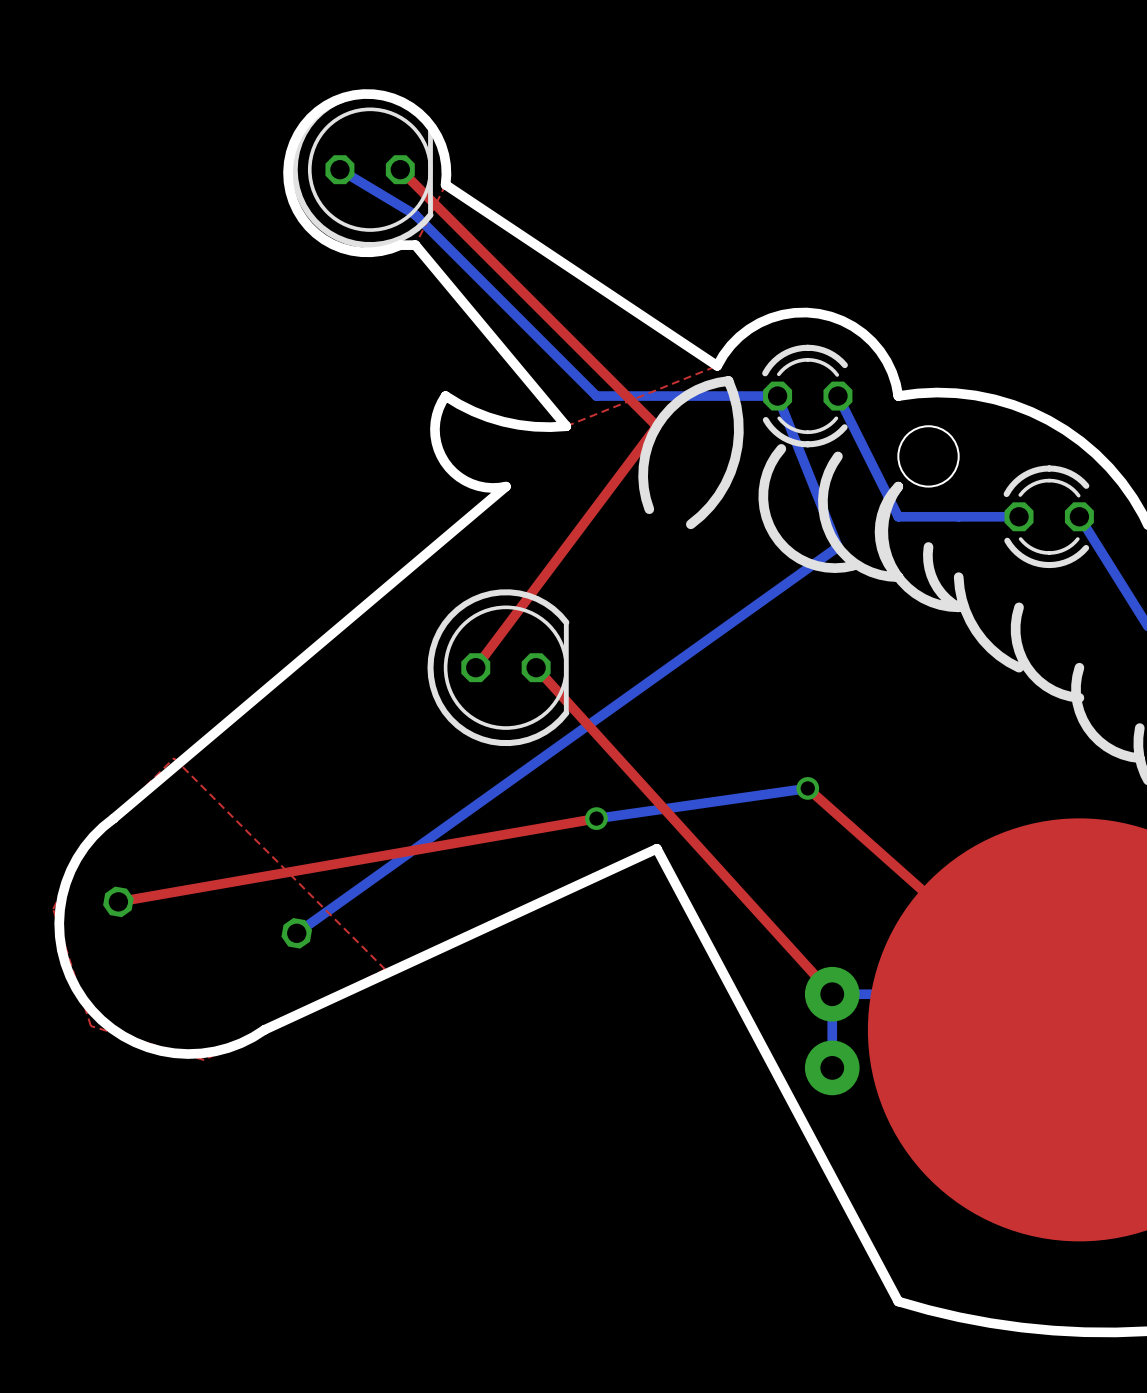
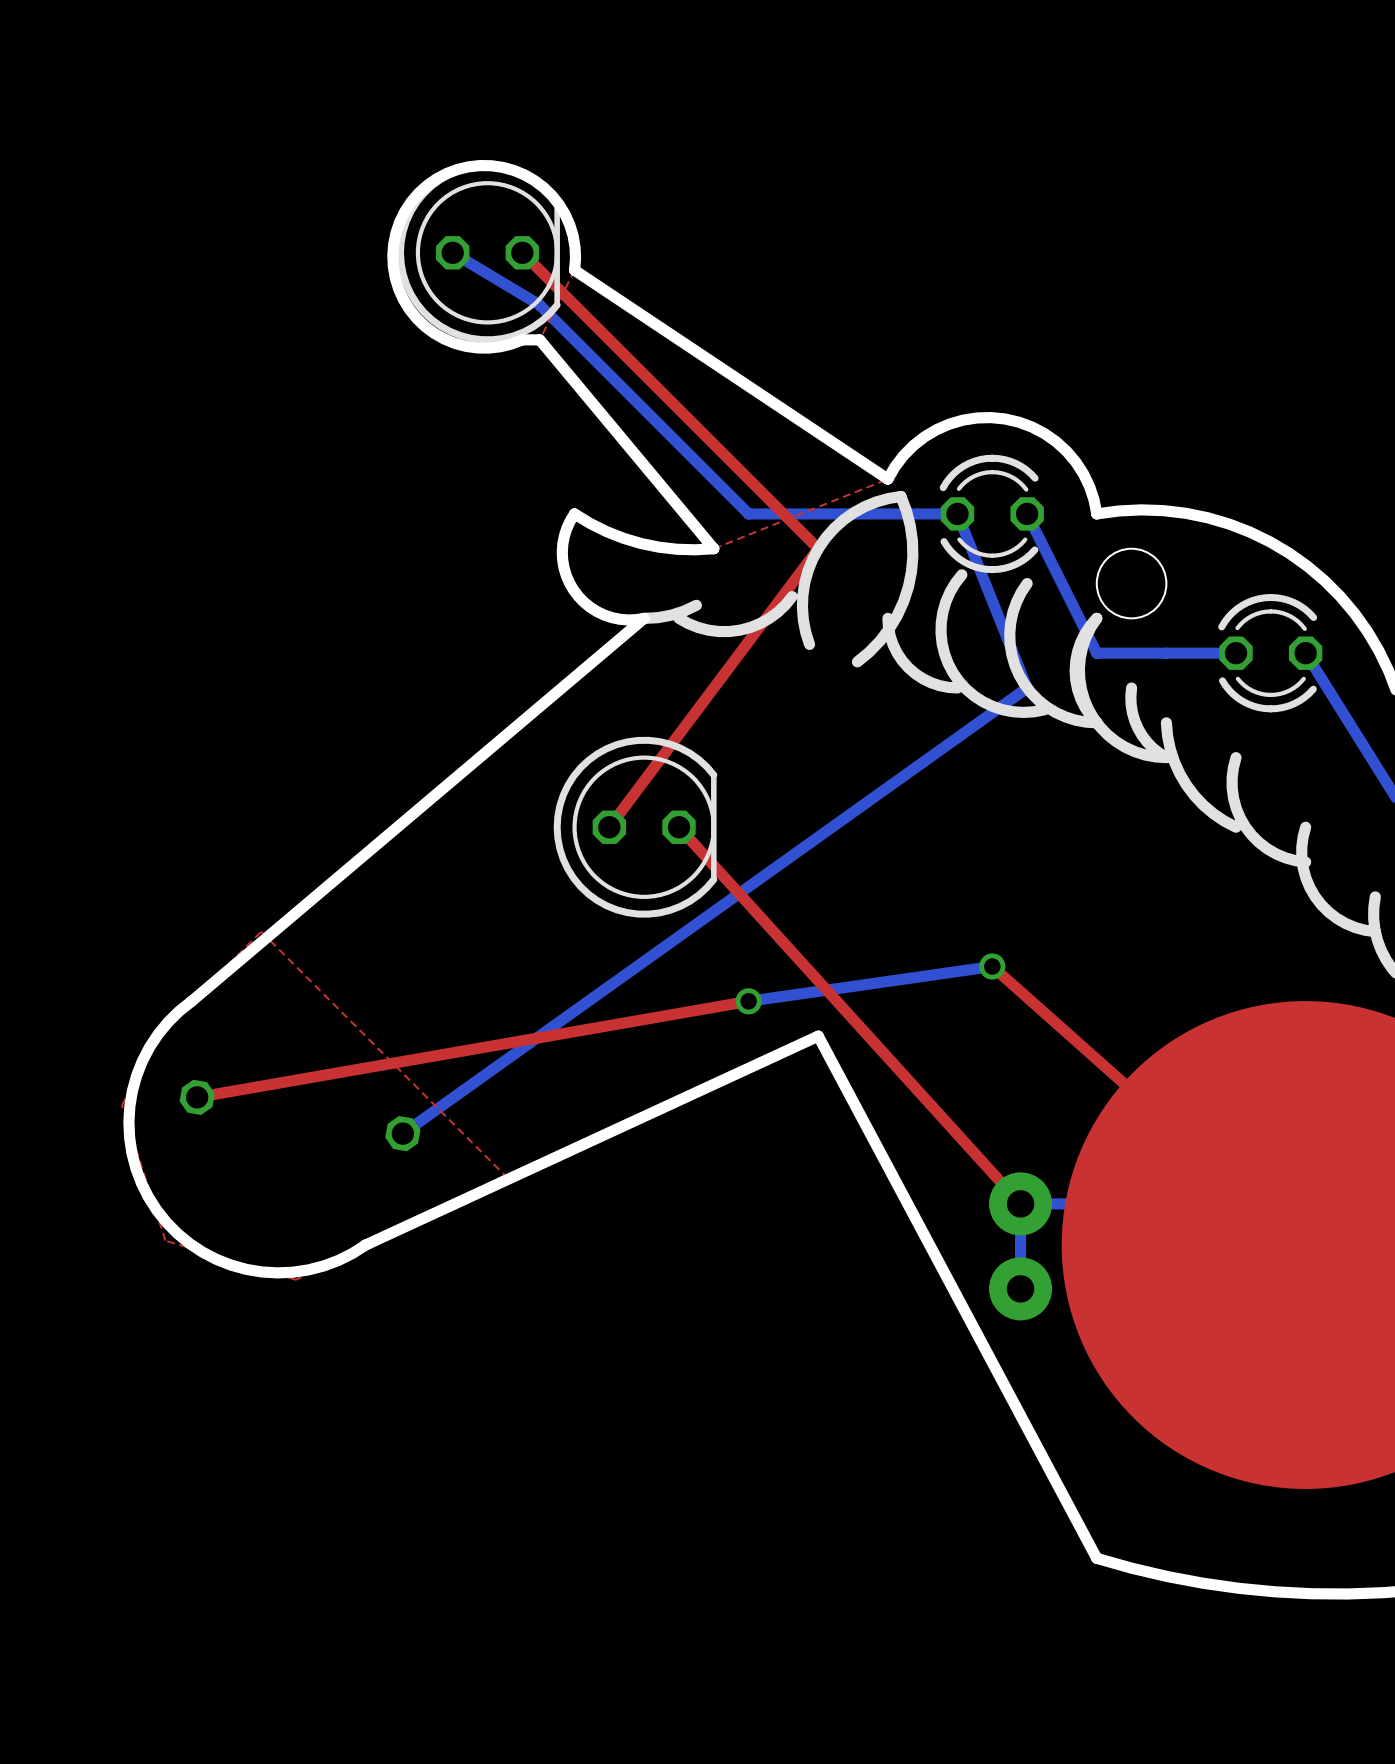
line: none -> (792, 596) (769, 618) (739, 630) (708, 630) (679, 618)
line: none -> (696, 605) (671, 615) (644, 618)
line: none -> (887, 618) (893, 645) (908, 667) (930, 682) (957, 687)

